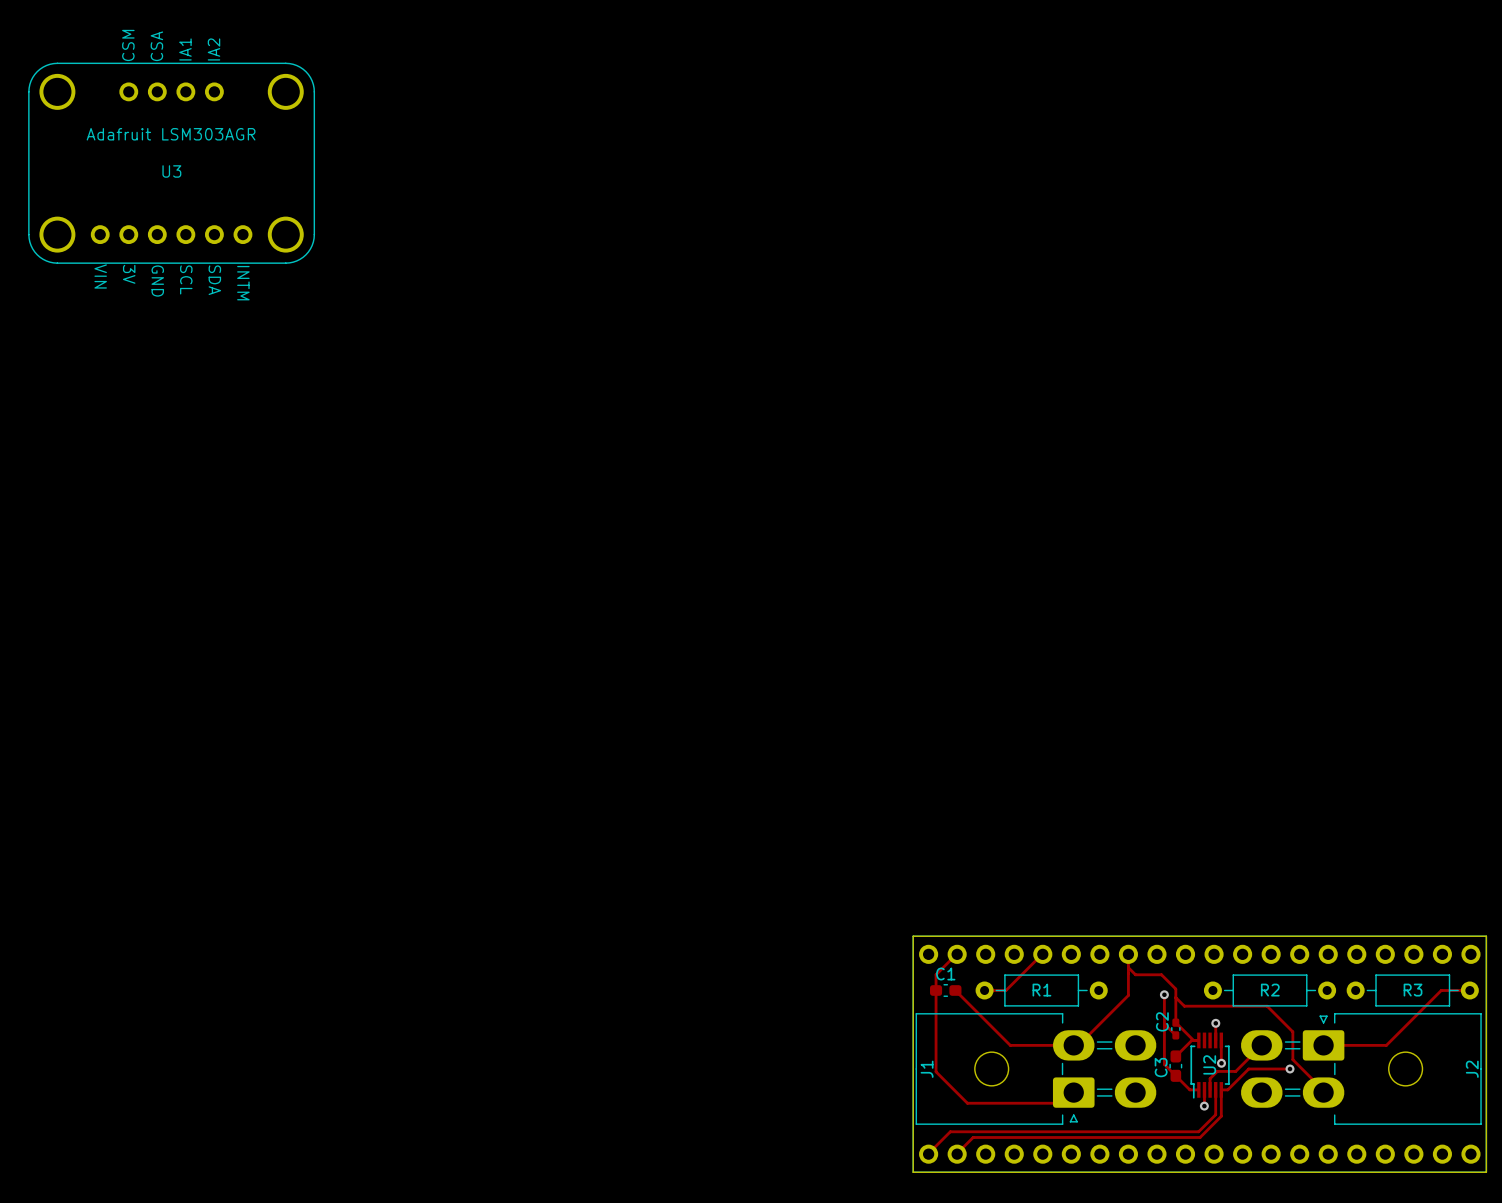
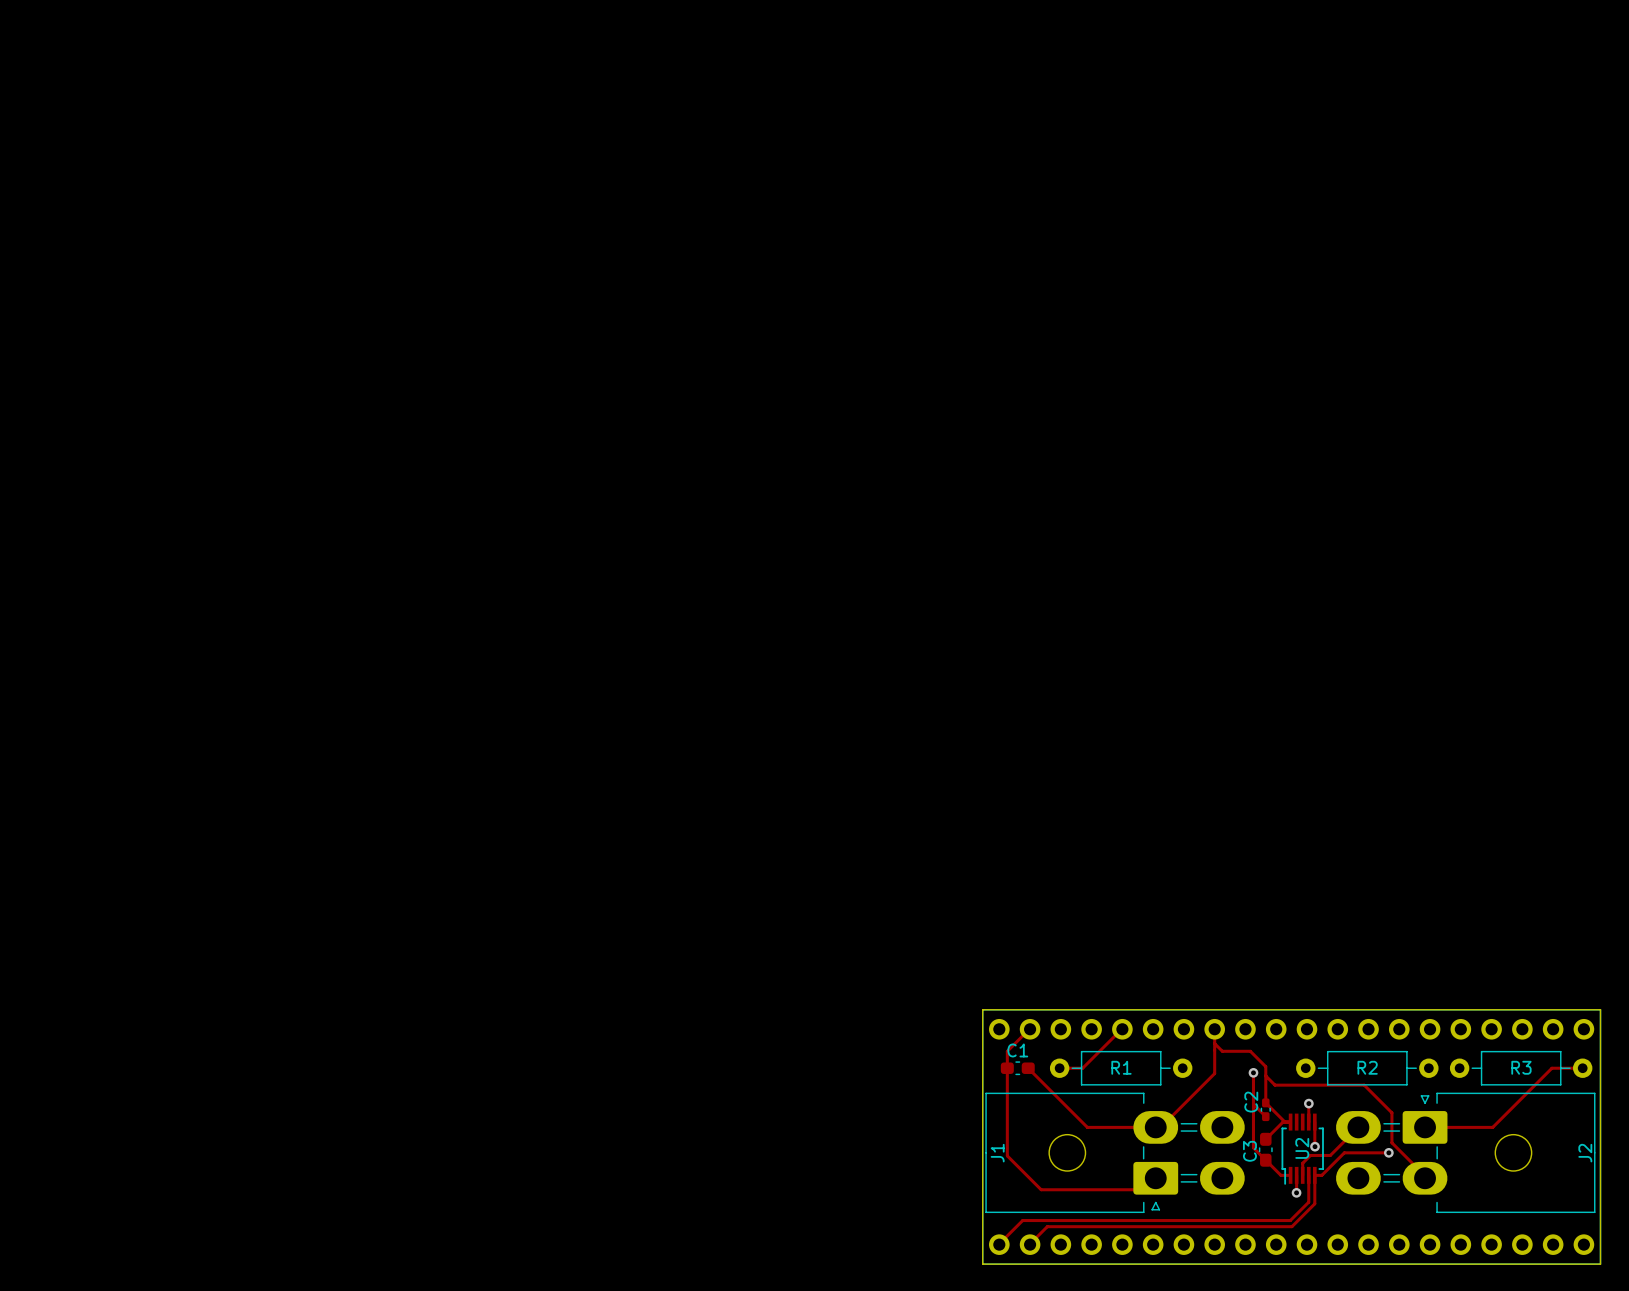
U3: (171, 163) -> none

